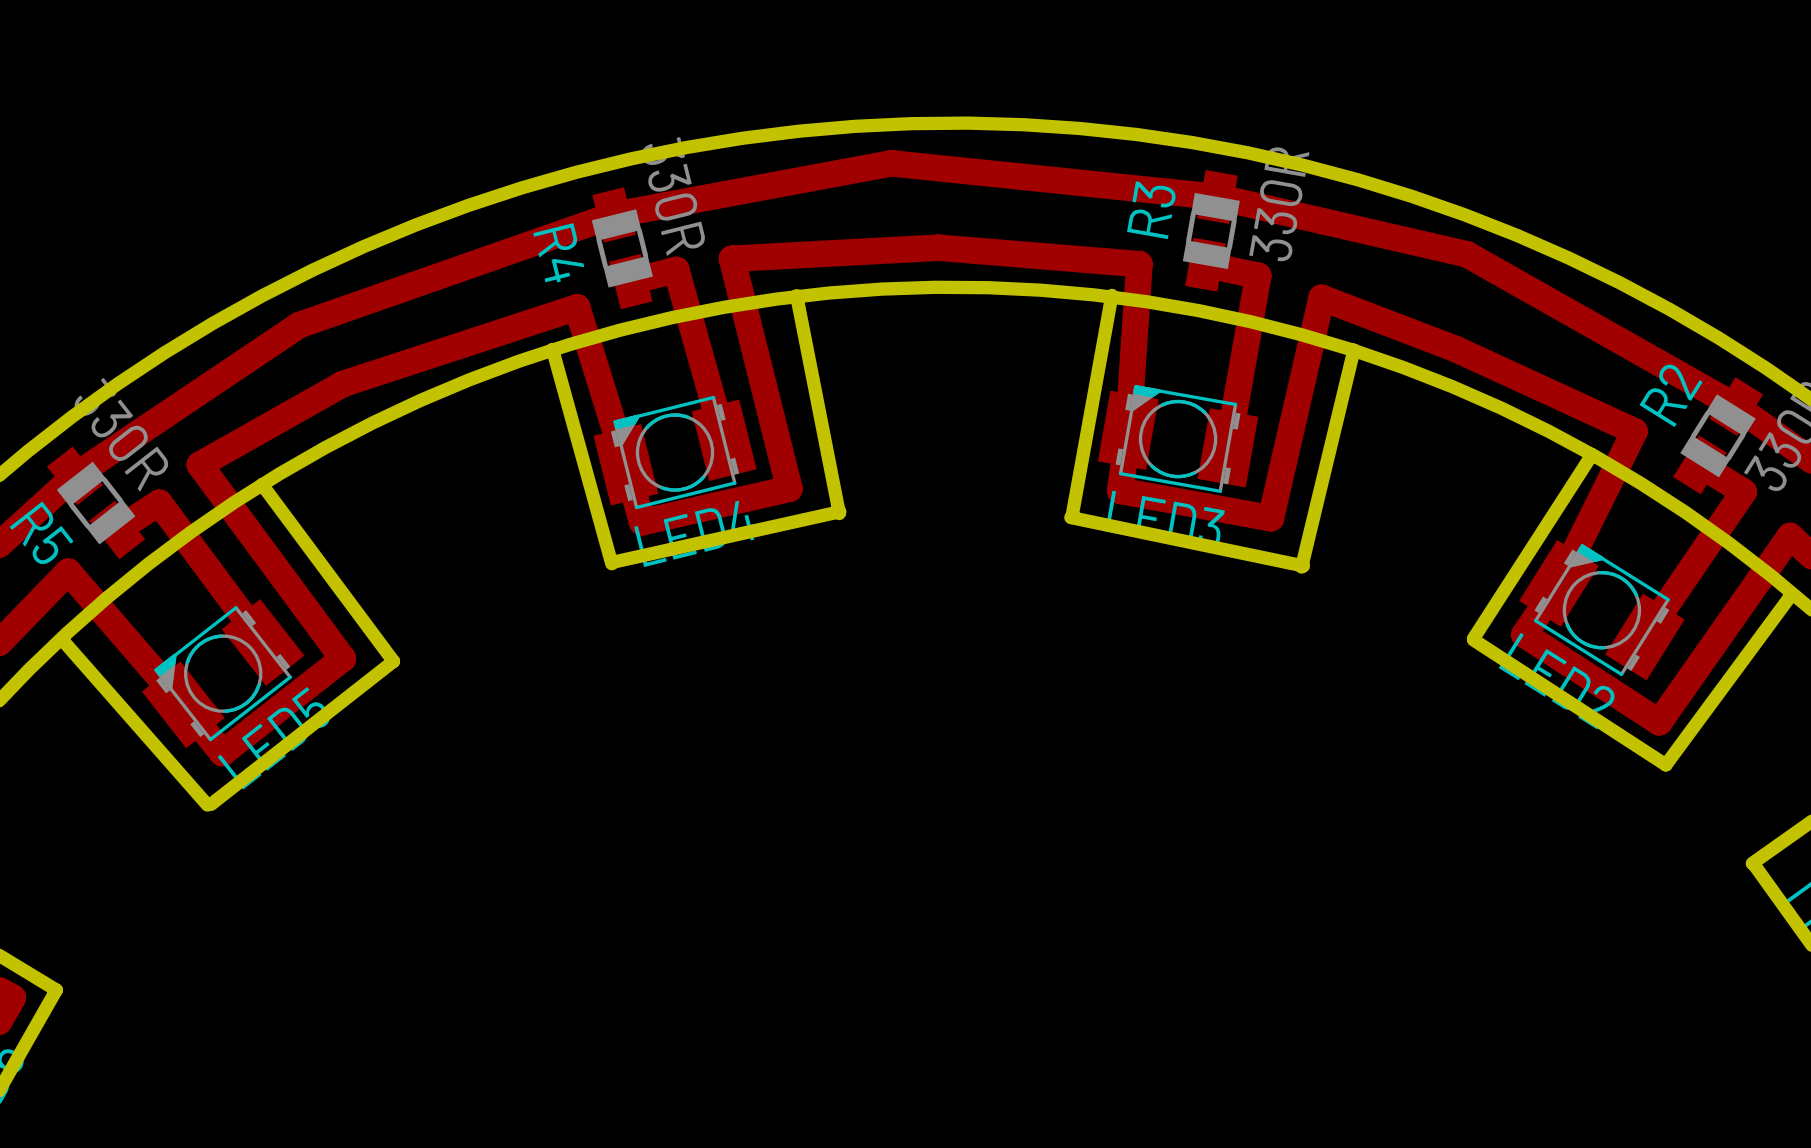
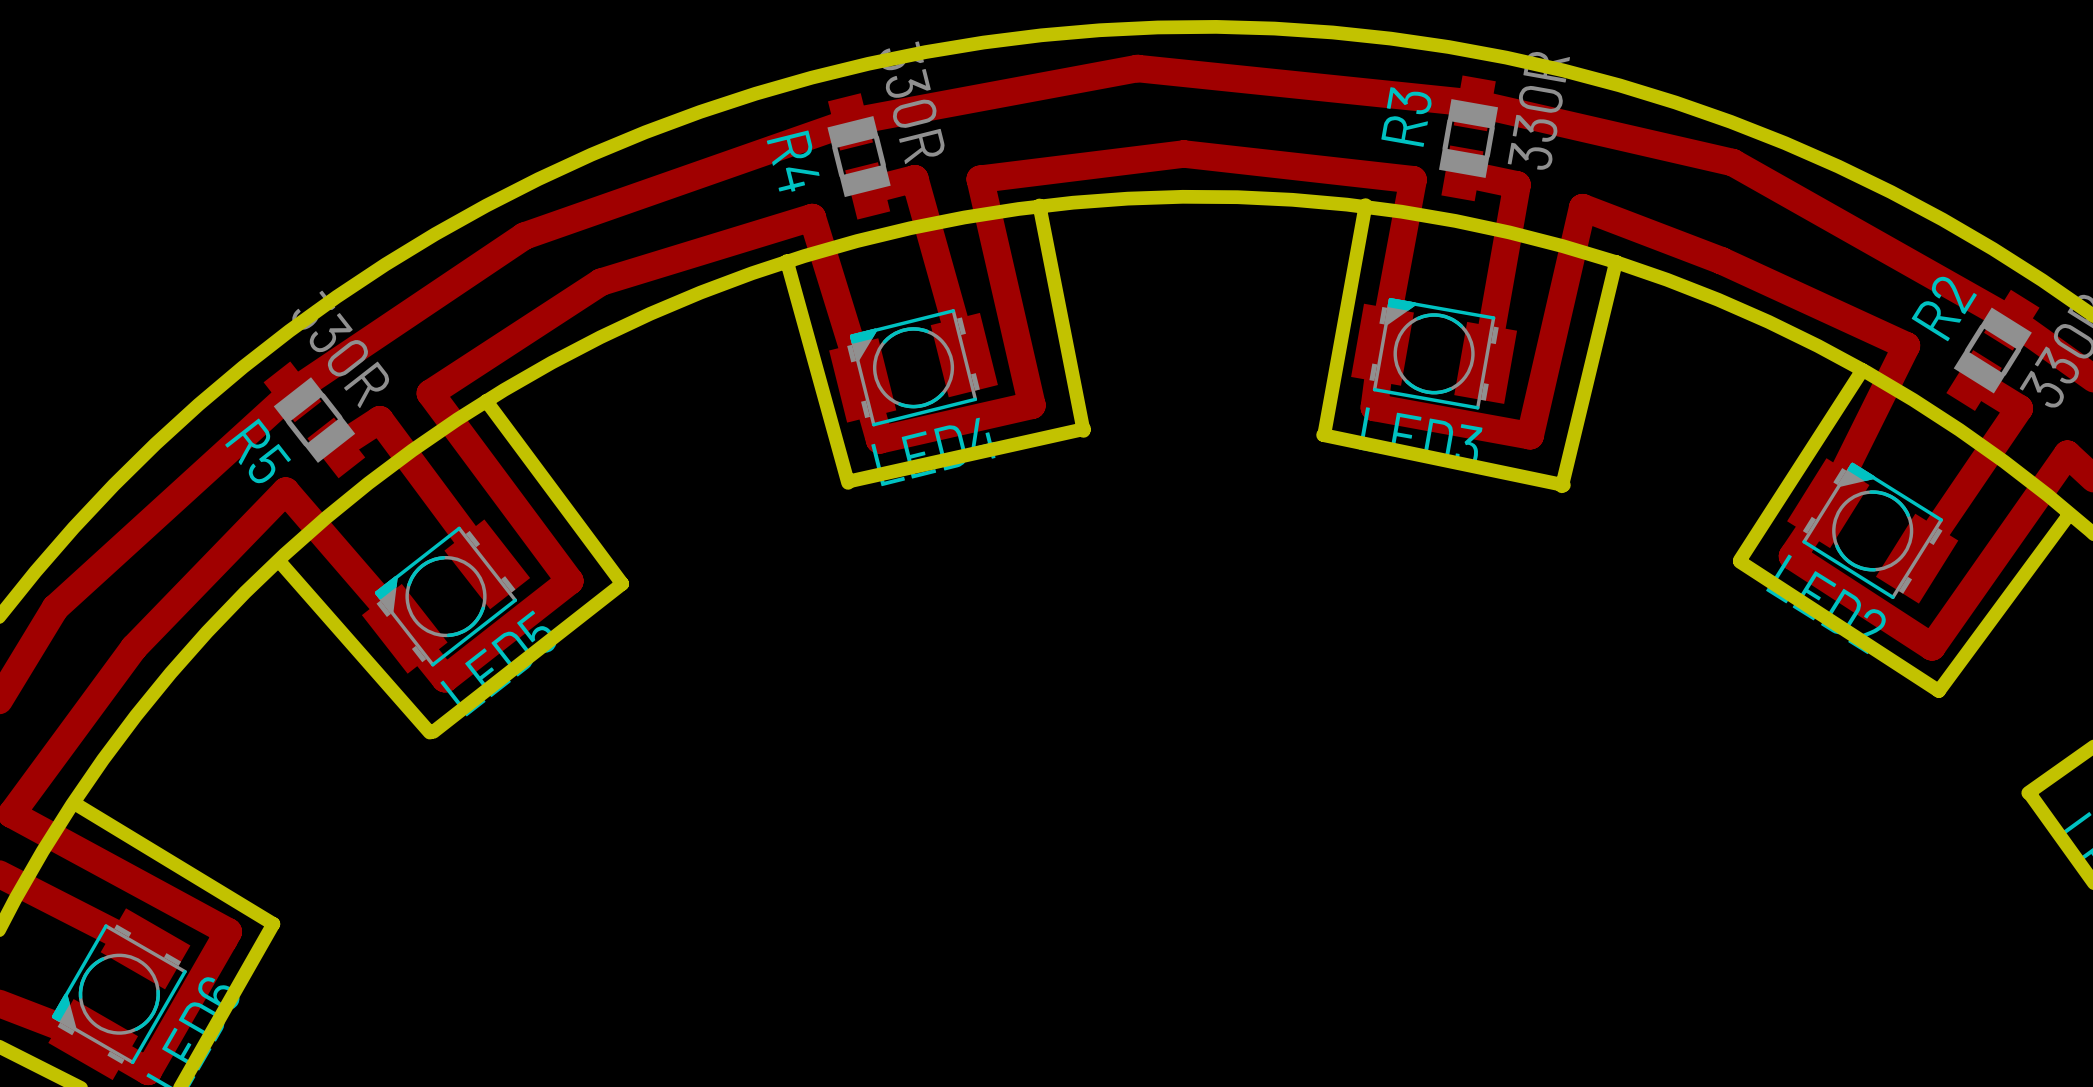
track: (577, 307) (342, 384) (199, 464) (342, 658) -> (812, 217) (600, 282) (430, 393) (569, 581)
track: (1128, 430) (1139, 264) (938, 247) (731, 258) (789, 488) -> (1382, 344) (1413, 179) (1183, 153) (980, 179) (1031, 405)

